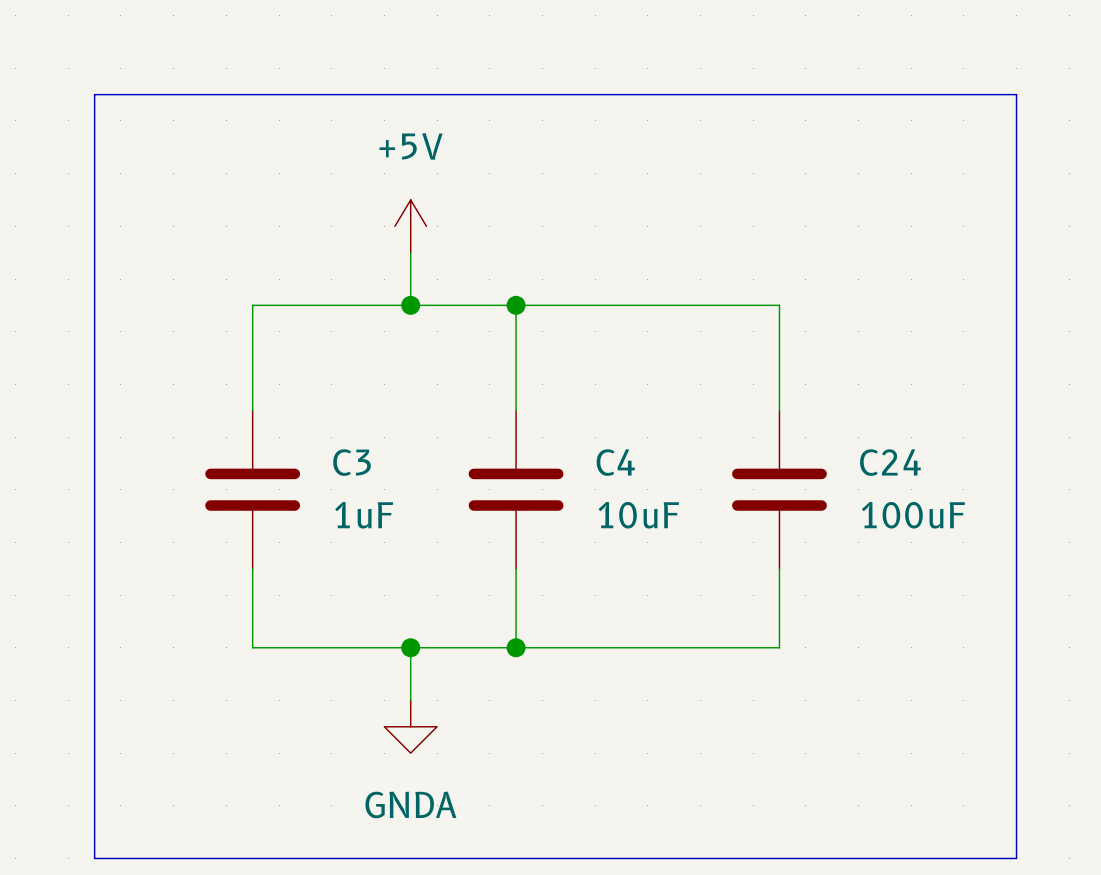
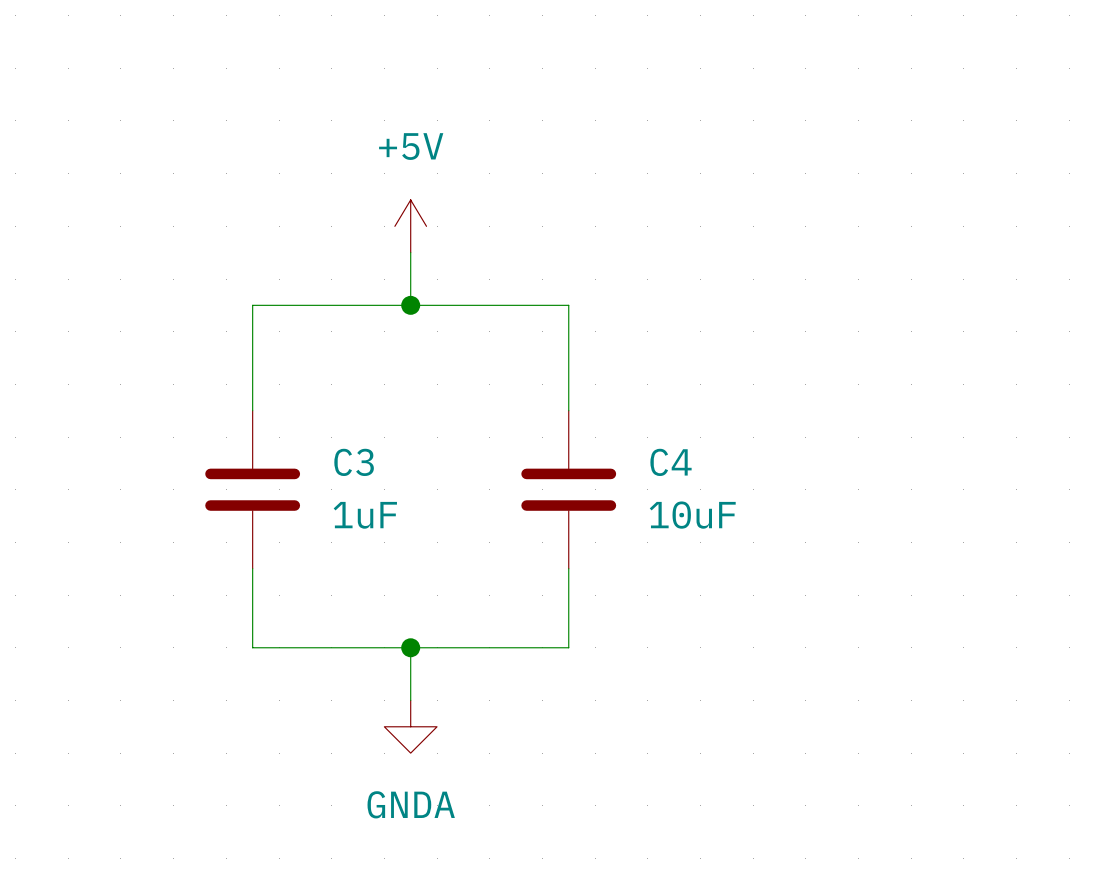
line: (94, 94) (1016, 94) (1016, 858) (94, 858) (94, 94) -> none
wire: (516, 305) (516, 410) -> none
junction: (516, 305) -> none
wire: (568, 305) (779, 305) (779, 410) -> (568, 305) (568, 410)
C4 position: (516, 489) -> (568, 489)
C24: 100uF (779, 489) -> none
wire: (516, 568) (516, 647) -> none
wire: (779, 568) (779, 647) (568, 647) -> (568, 568) (568, 647)
junction: (516, 647) -> none

